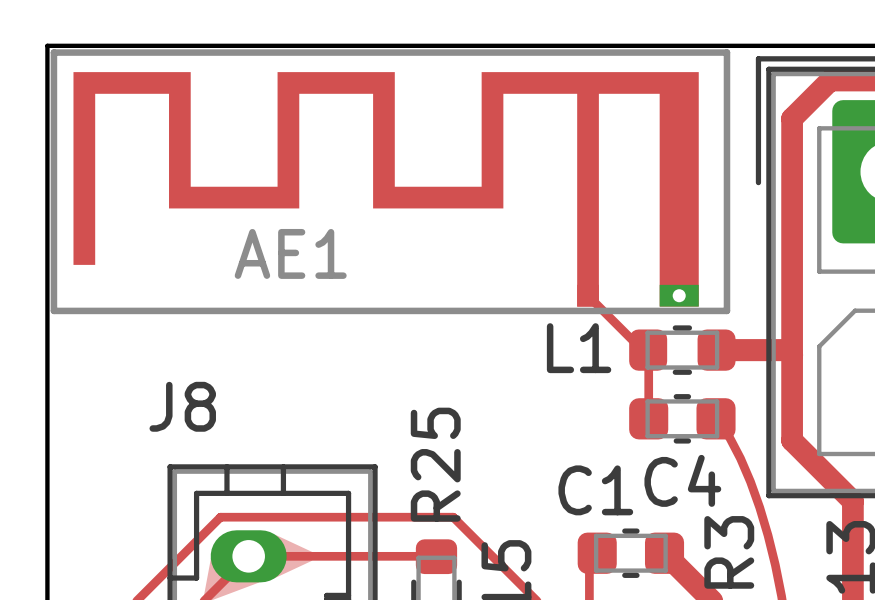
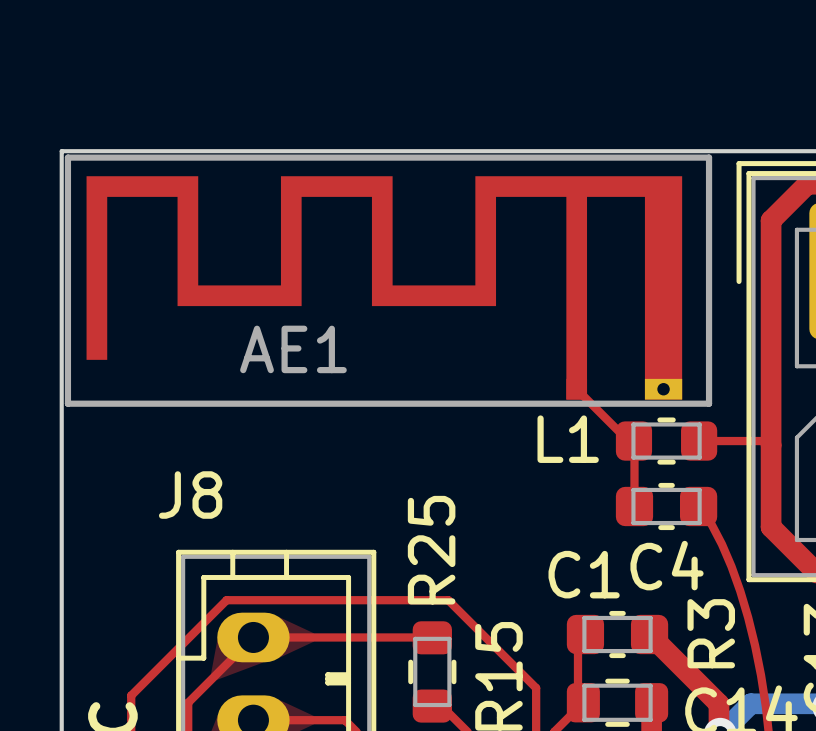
top track width: thick (716, 350) (787, 350) (792, 354) -> thin (699, 441) (766, 441) (771, 445)

